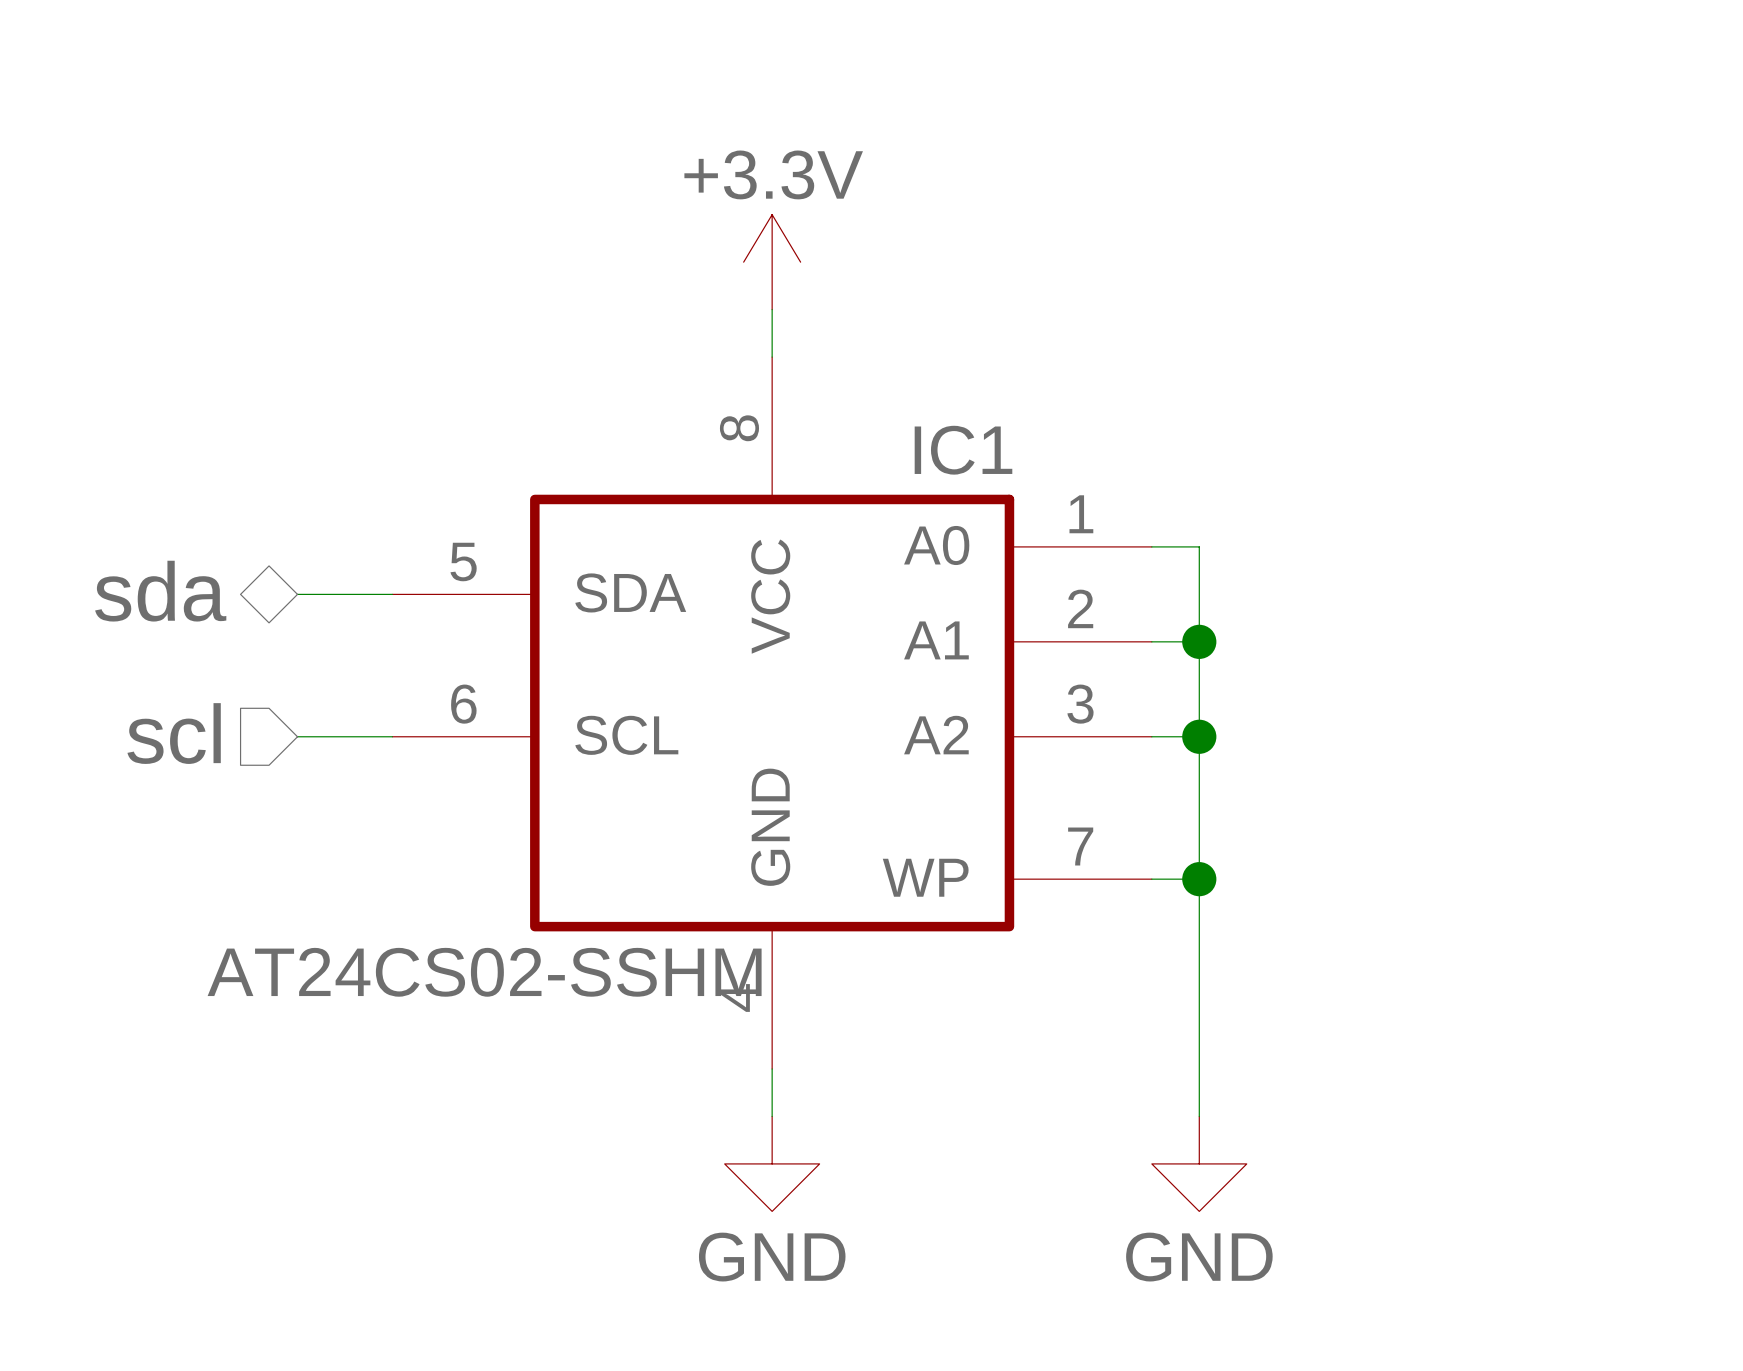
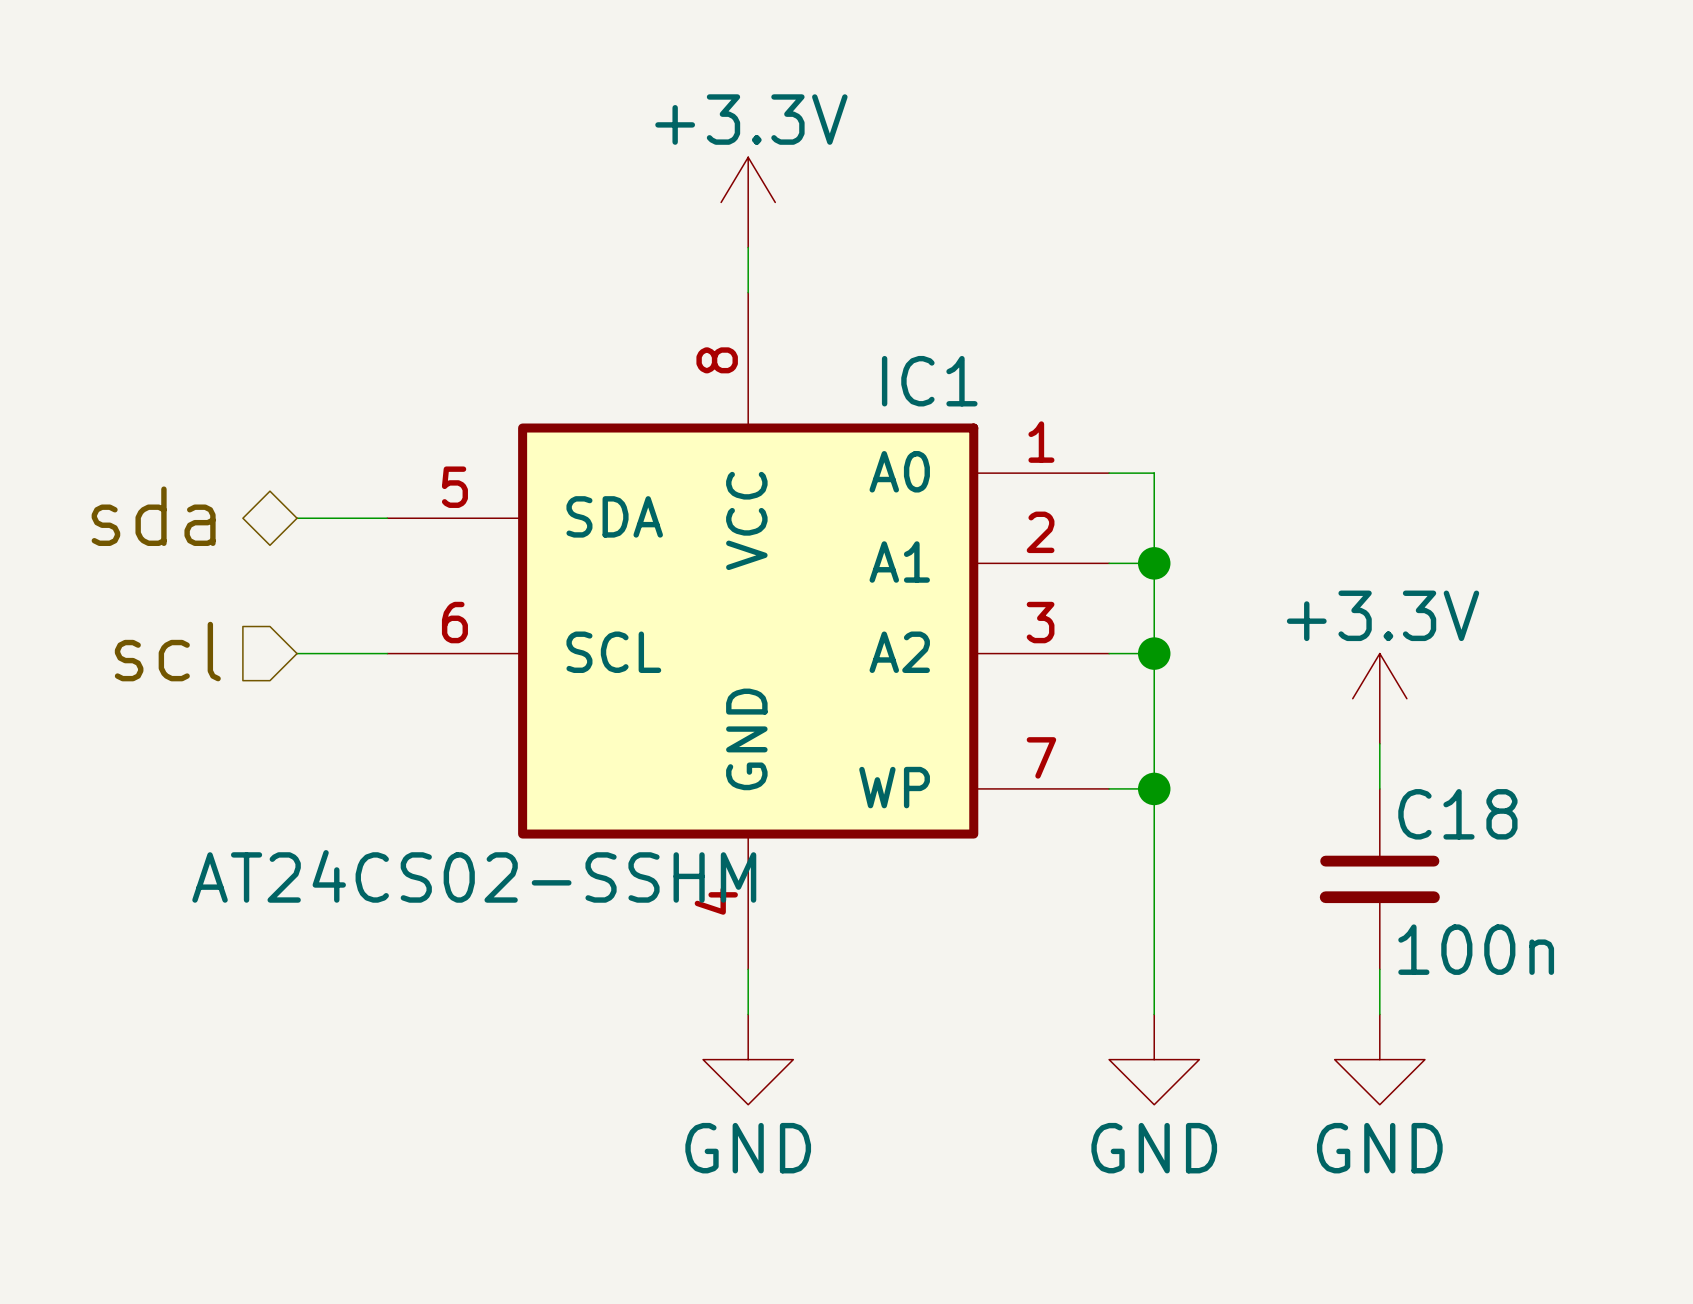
power symbol: none -> +3.3V (1379, 698)
wire: none -> (1379, 743) (1379, 788)
C18: none -> 100n (1379, 879)
wire: none -> (1379, 969) (1379, 1014)
power symbol: none -> GND (1379, 1059)

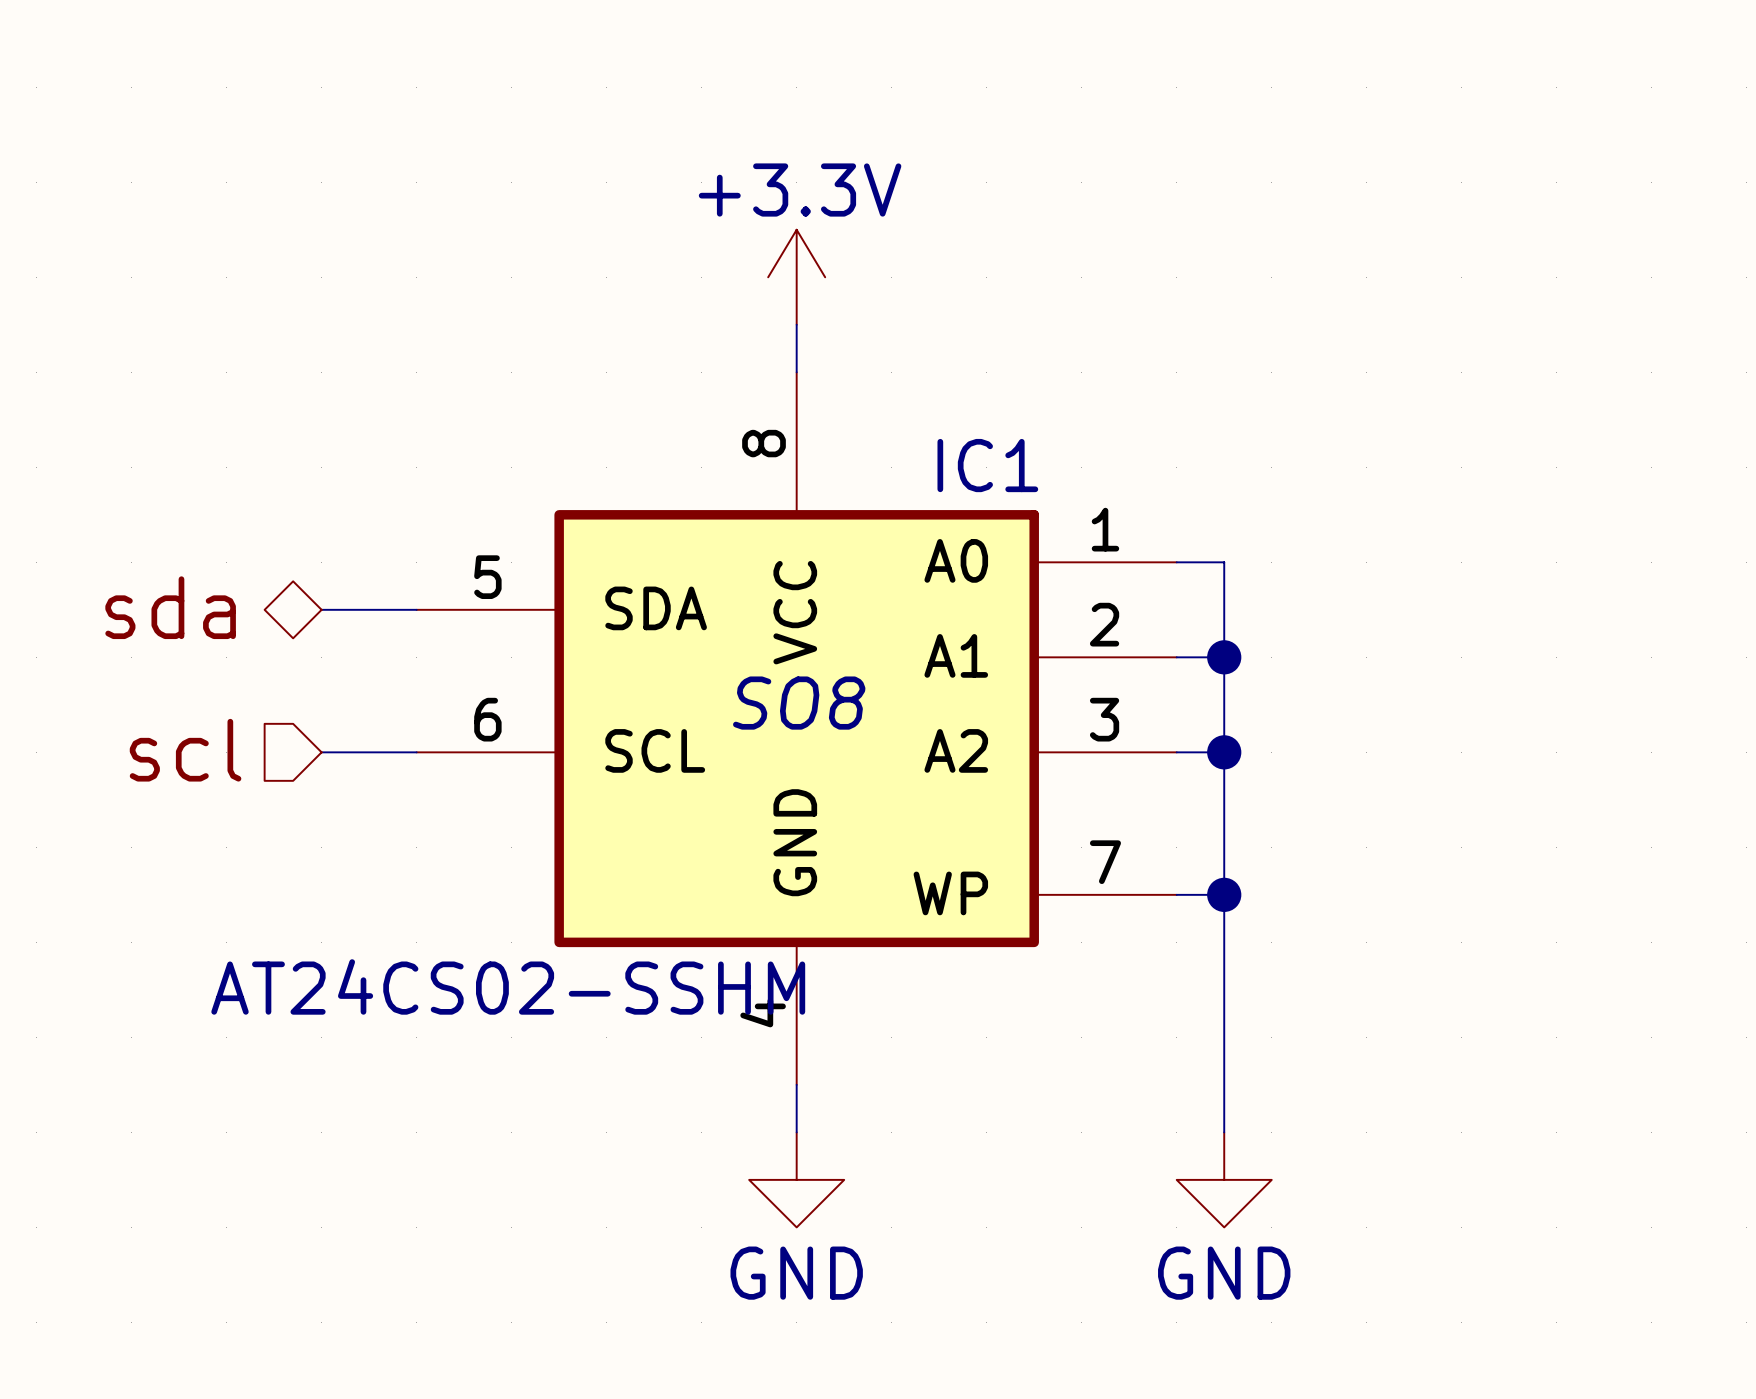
IC1 text: none -> SO8 (799, 703)
power symbol: +3.3V (1379, 698) -> none
wire: (1379, 743) (1379, 788) -> none
C18: 100n (1379, 879) -> none
wire: (1379, 969) (1379, 1014) -> none
power symbol: GND (1379, 1059) -> none

